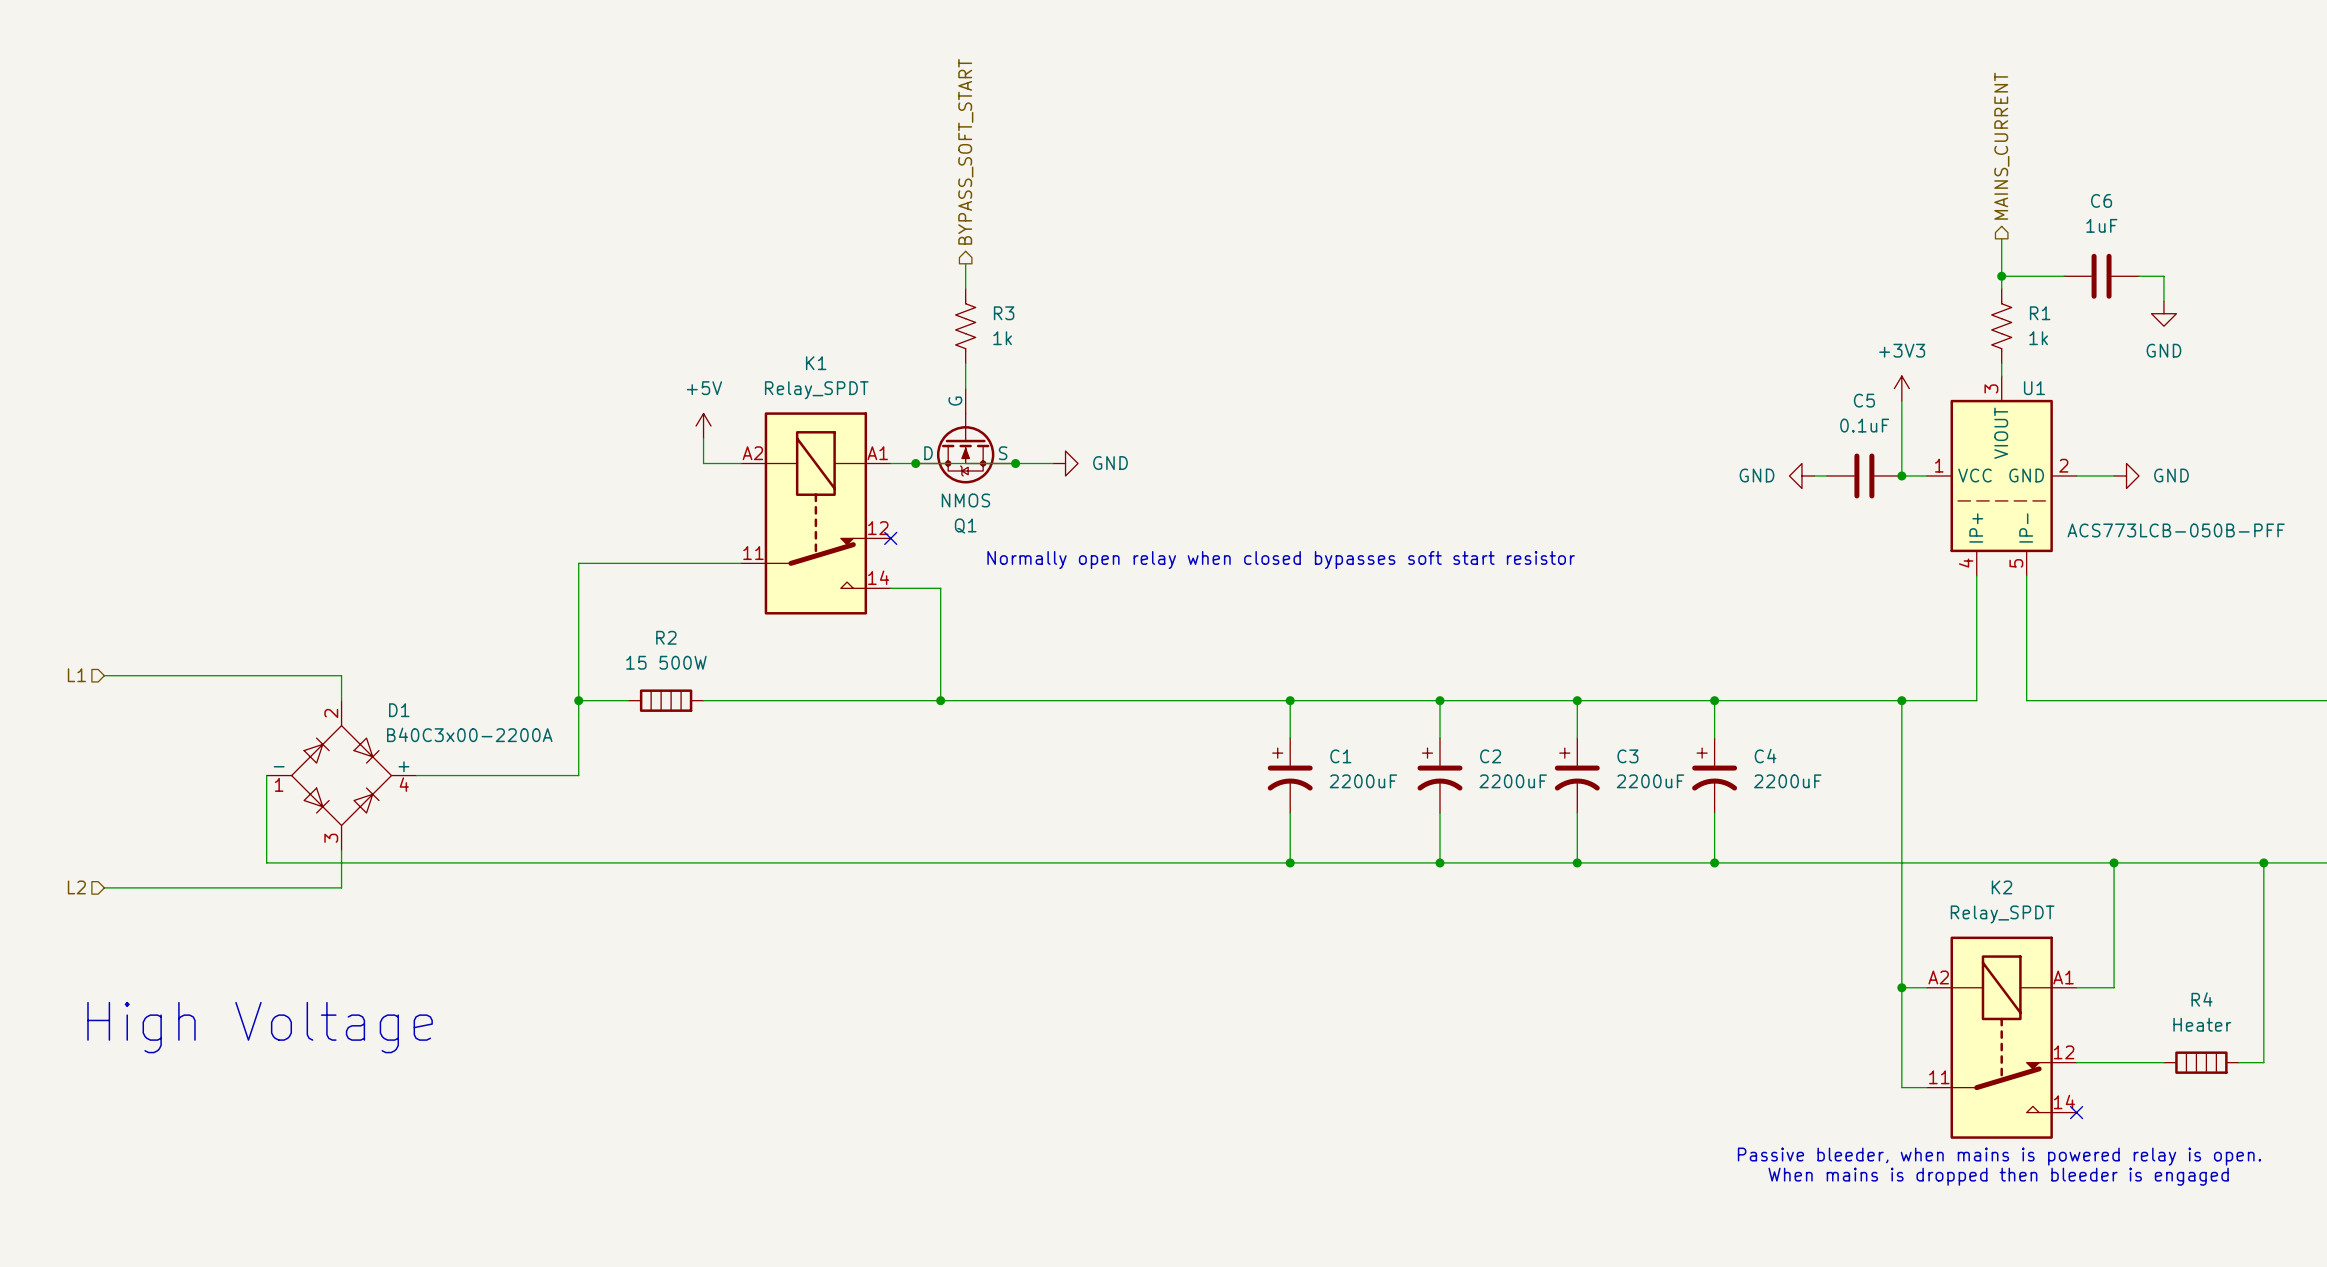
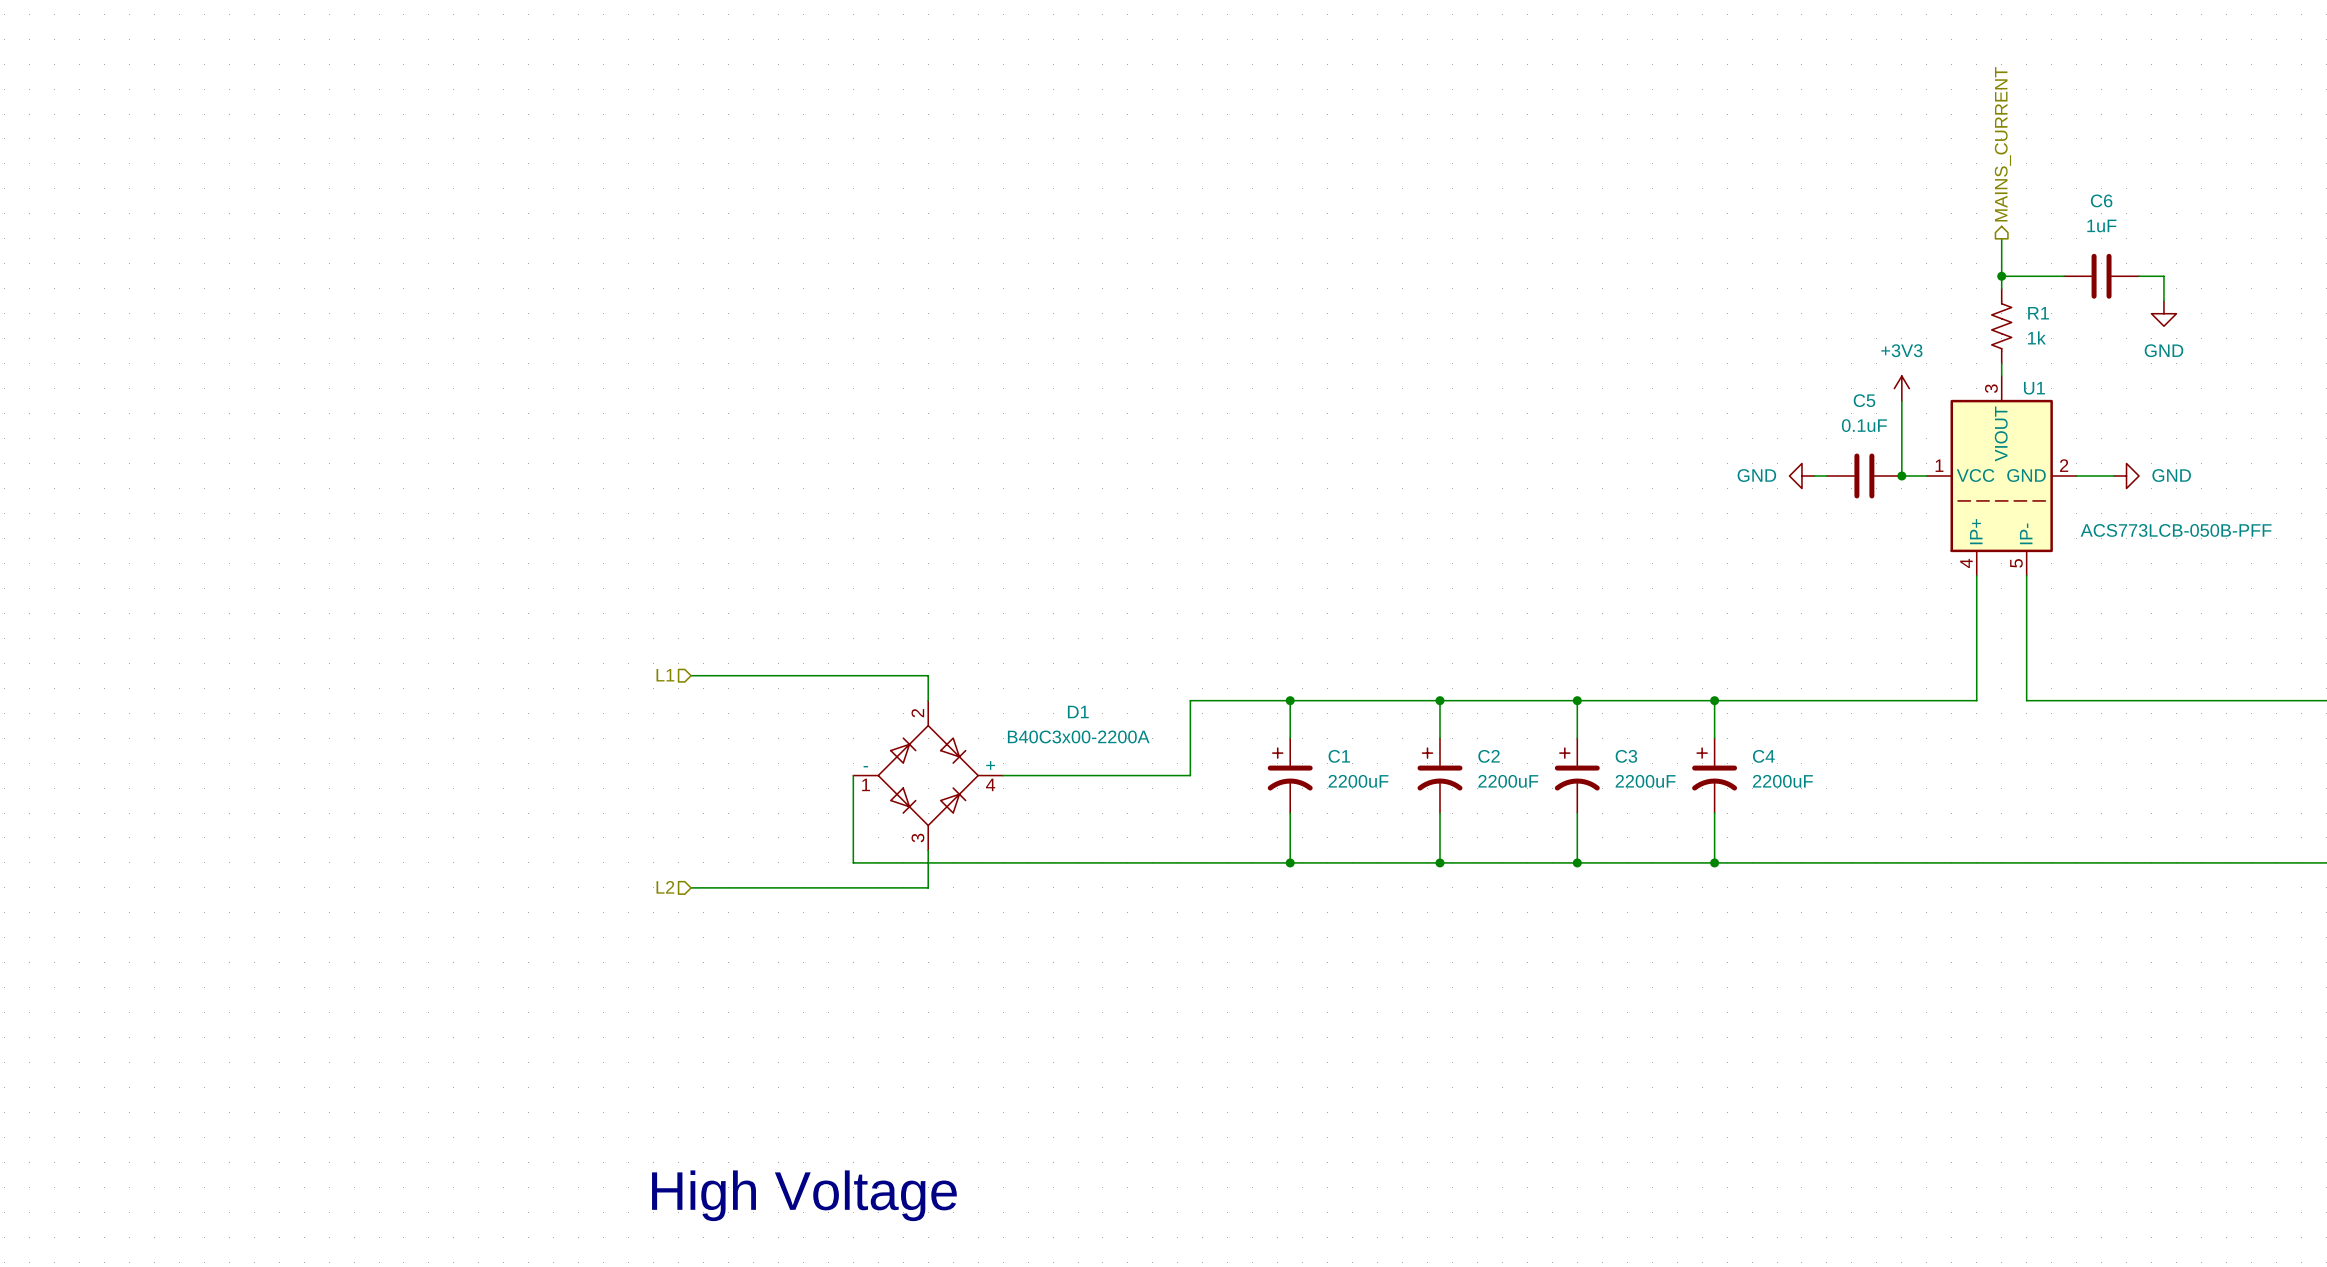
hierarchical label: BYPASS_SOFT_START (965, 151) -> none
wire: (965, 263) (965, 288) -> none
R3: 1k (965, 326) -> none
wire: (965, 363) (965, 388) -> none
power symbol: +5V (703, 426) -> none
Q1: NMOS (965, 436) -> none
wire: (703, 438) (703, 463) (740, 463) -> none
wire: (890, 463) (1053, 463) -> none
junction: (915, 463) -> none
junction: (1015, 463) -> none
power symbol: GND (1065, 463) -> none
K1: Relay_SPDT (815, 513) -> none
no-connect mark: (890, 538) -> none
text: Normally open relay when closed bypasses soft start resistor (1281, 560) -> none
wire: (740, 563) (578, 563) (578, 775) (416, 775) -> none
wire: (890, 588) (940, 588) (940, 700) -> none
hierarchical label: L1 (76, 675) -> none
wire: (104, 675) (341, 675) (341, 700) -> none
hierarchical label: none -> L1 (665, 675)
wire: none -> (691, 675) (928, 675) (928, 700)
wire: (578, 700) (628, 700) -> none
junction: (578, 700) -> none
R2: 15 500W (666, 700) -> none
wire: (703, 700) (1190, 700) -> (1003, 775) (1190, 775) (1190, 700)
junction: (940, 700) -> none
wire: (1901, 700) (1901, 1087) (1926, 1087) -> none
junction: (1901, 700) -> none
D1 name position: D1 (399, 710) -> D1 (1078, 712)
D1 value position: B40C3x00-2200A (469, 734) -> B40C3x00-2200A (1078, 736)
wire: (266, 775) (266, 862) (853, 862) -> (853, 775) (853, 862)
D1 position: (341, 775) -> (928, 775)
wire: (341, 850) (341, 887) (104, 887) -> none
wire: none -> (928, 850) (928, 887) (691, 887)
wire: (2114, 862) (2114, 987) (2076, 987) -> none
junction: (2114, 862) -> none
wire: (2263, 862) (2263, 1062) (2238, 1062) -> none
junction: (2263, 862) -> none
hierarchical label: L2 (76, 887) -> none
hierarchical label: none -> L2 (665, 887)
wire: (1901, 987) (1926, 987) -> none
junction: (1901, 987) -> none
text: High Voltage (260, 1027) -> none
K2: Relay_SPDT (2001, 1037) -> none
wire: (2076, 1062) (2163, 1062) -> none
R4: Heater (2201, 1062) -> none
no-connect mark: (2076, 1112) -> none
text: Passive bleeder, when mains is powered relay is open. (1999, 1156) -> none
text: When mains is dropped then bleeder is engaged (1998, 1176) -> none
text: none -> High Voltage (804, 1195)

